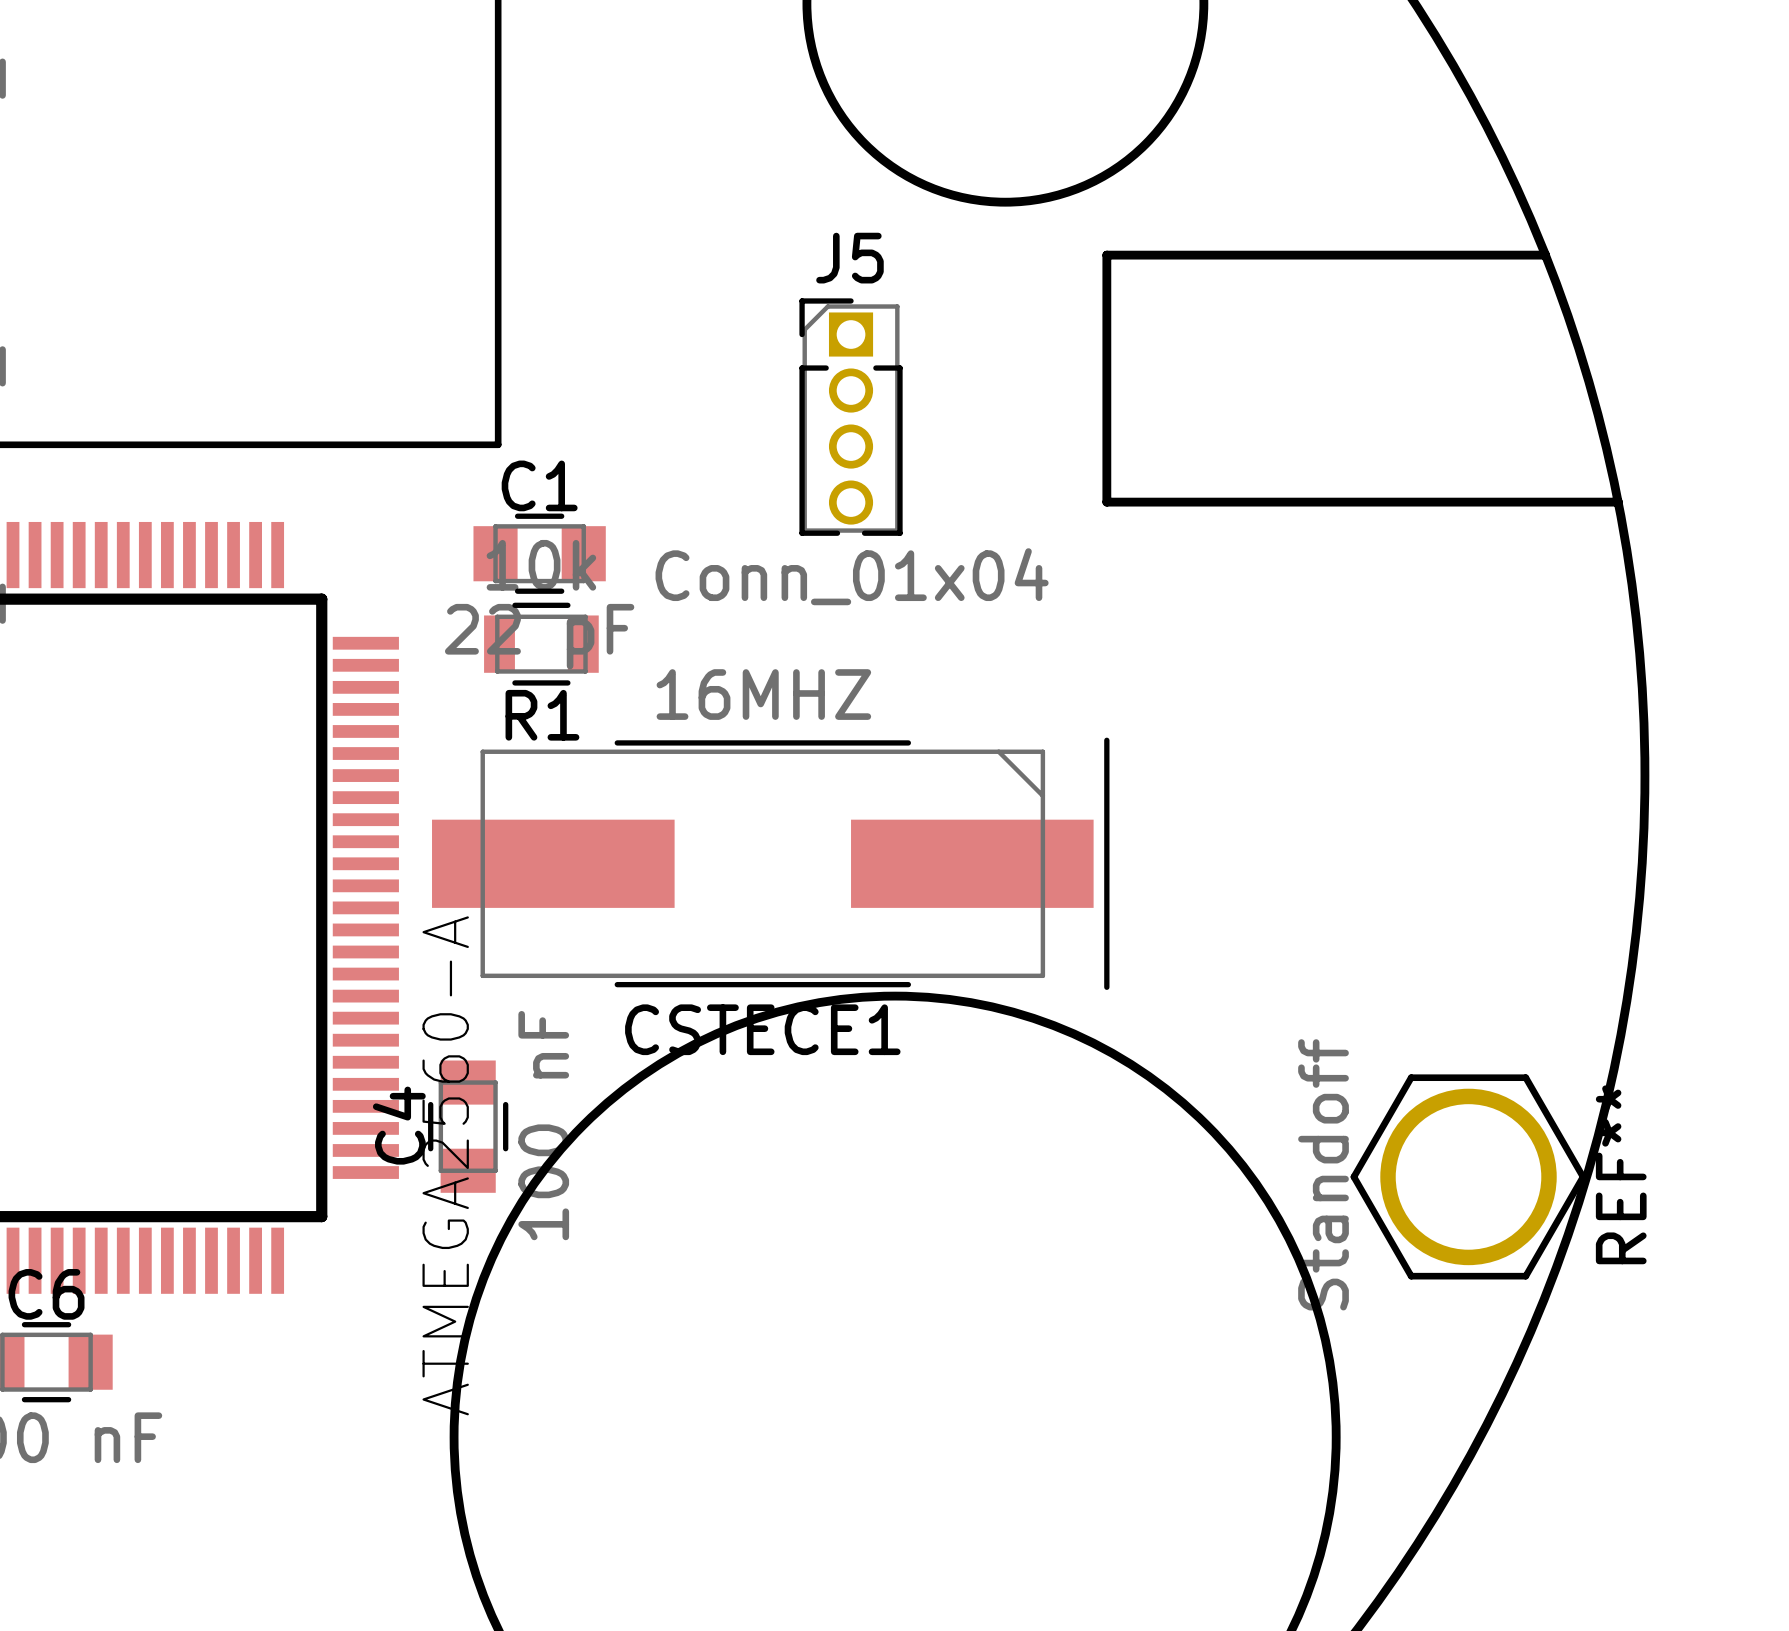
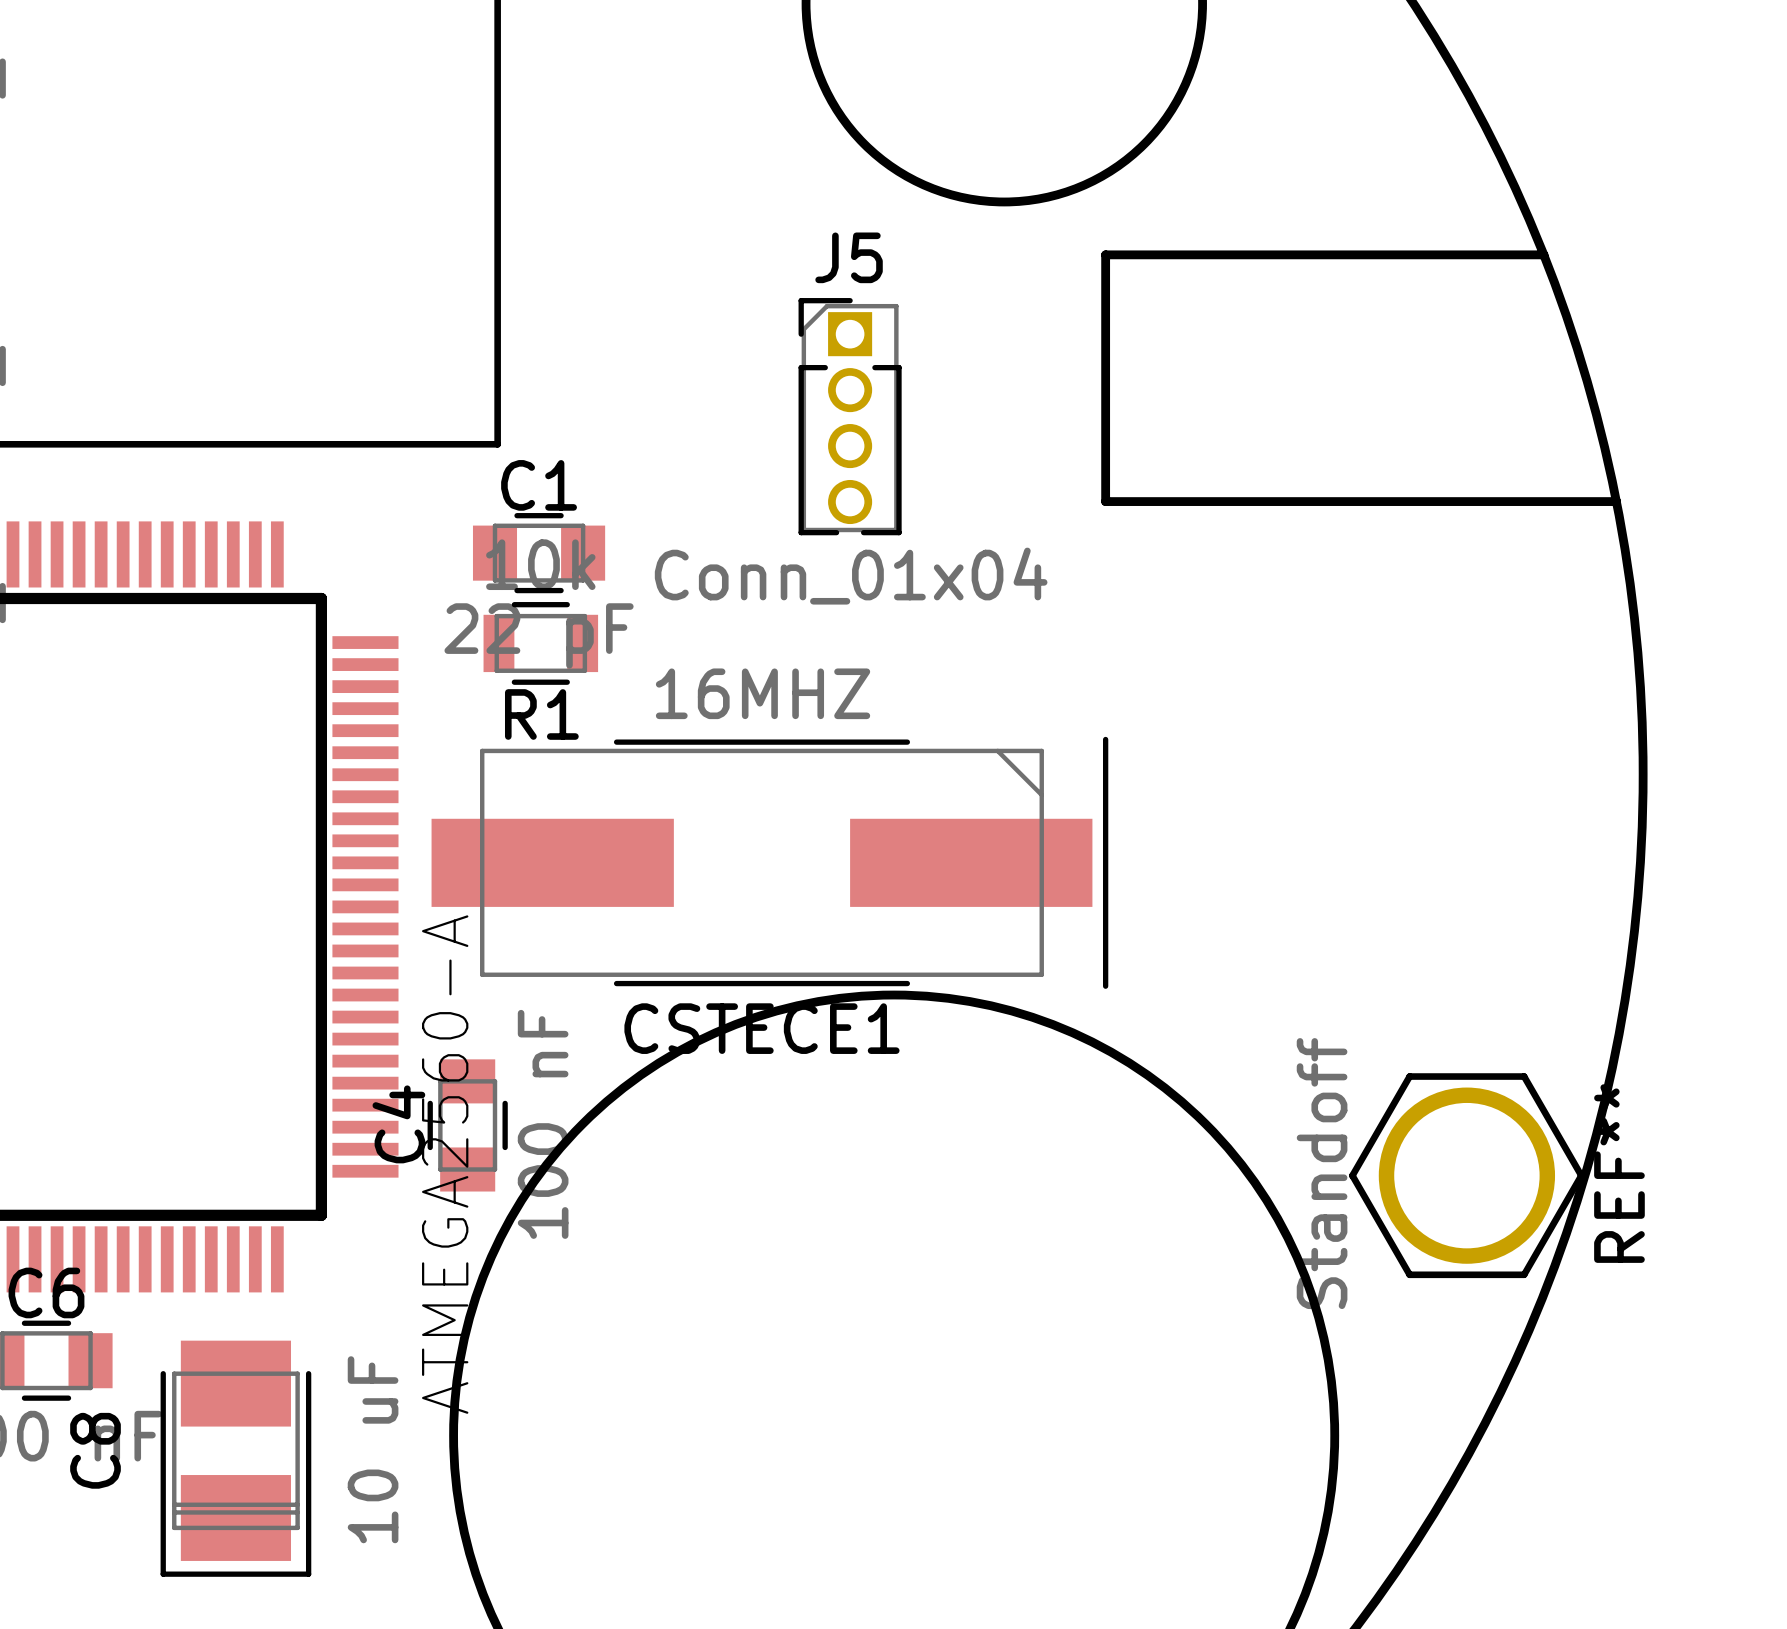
C8: none -> 10 uF (235, 1458)

